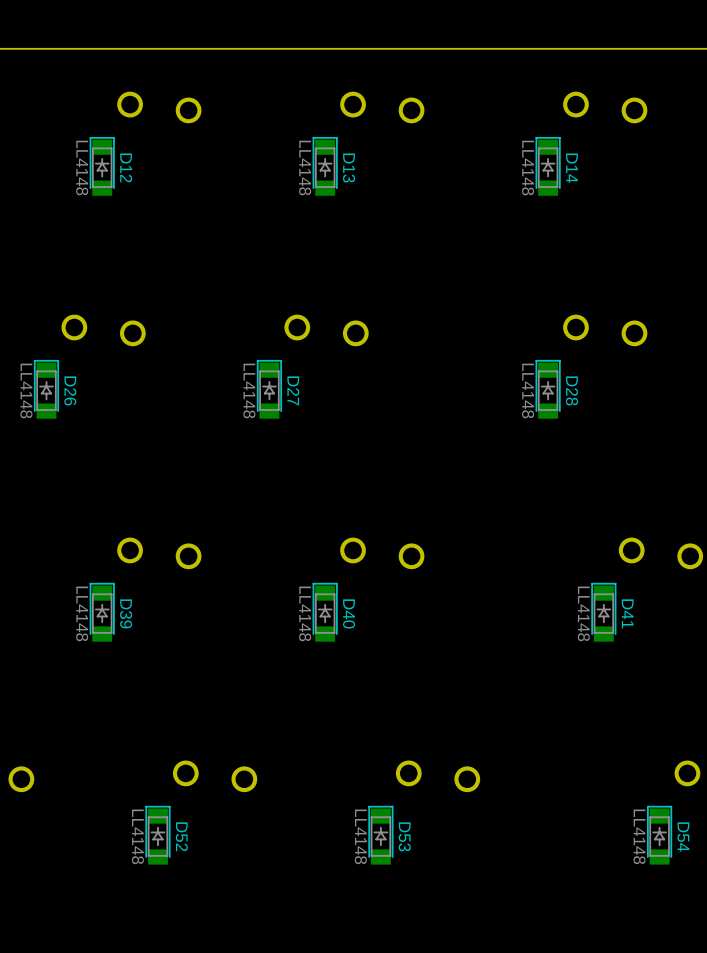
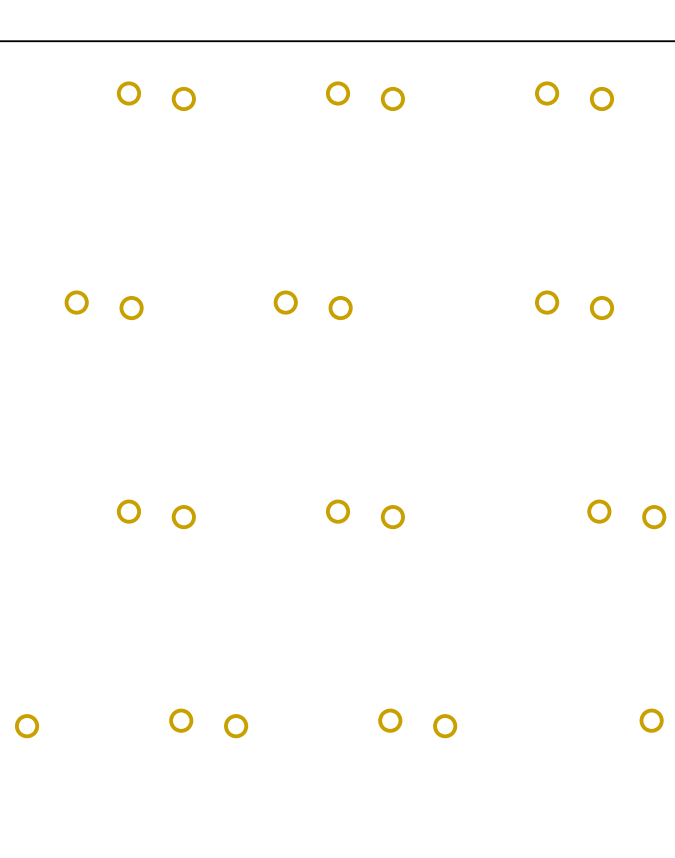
D12: LL4148 (102, 166) -> none
D13: LL4148 (325, 166) -> none
D14: LL4148 (548, 166) -> none
D26: LL4148 (46, 389) -> none
D27: LL4148 (269, 389) -> none
D28: LL4148 (548, 389) -> none
D39: LL4148 (102, 612) -> none
D40: LL4148 (325, 612) -> none
D41: LL4148 (603, 612) -> none
D52: LL4148 (157, 835) -> none
D53: LL4148 (380, 835) -> none
D54: LL4148 (659, 835) -> none

